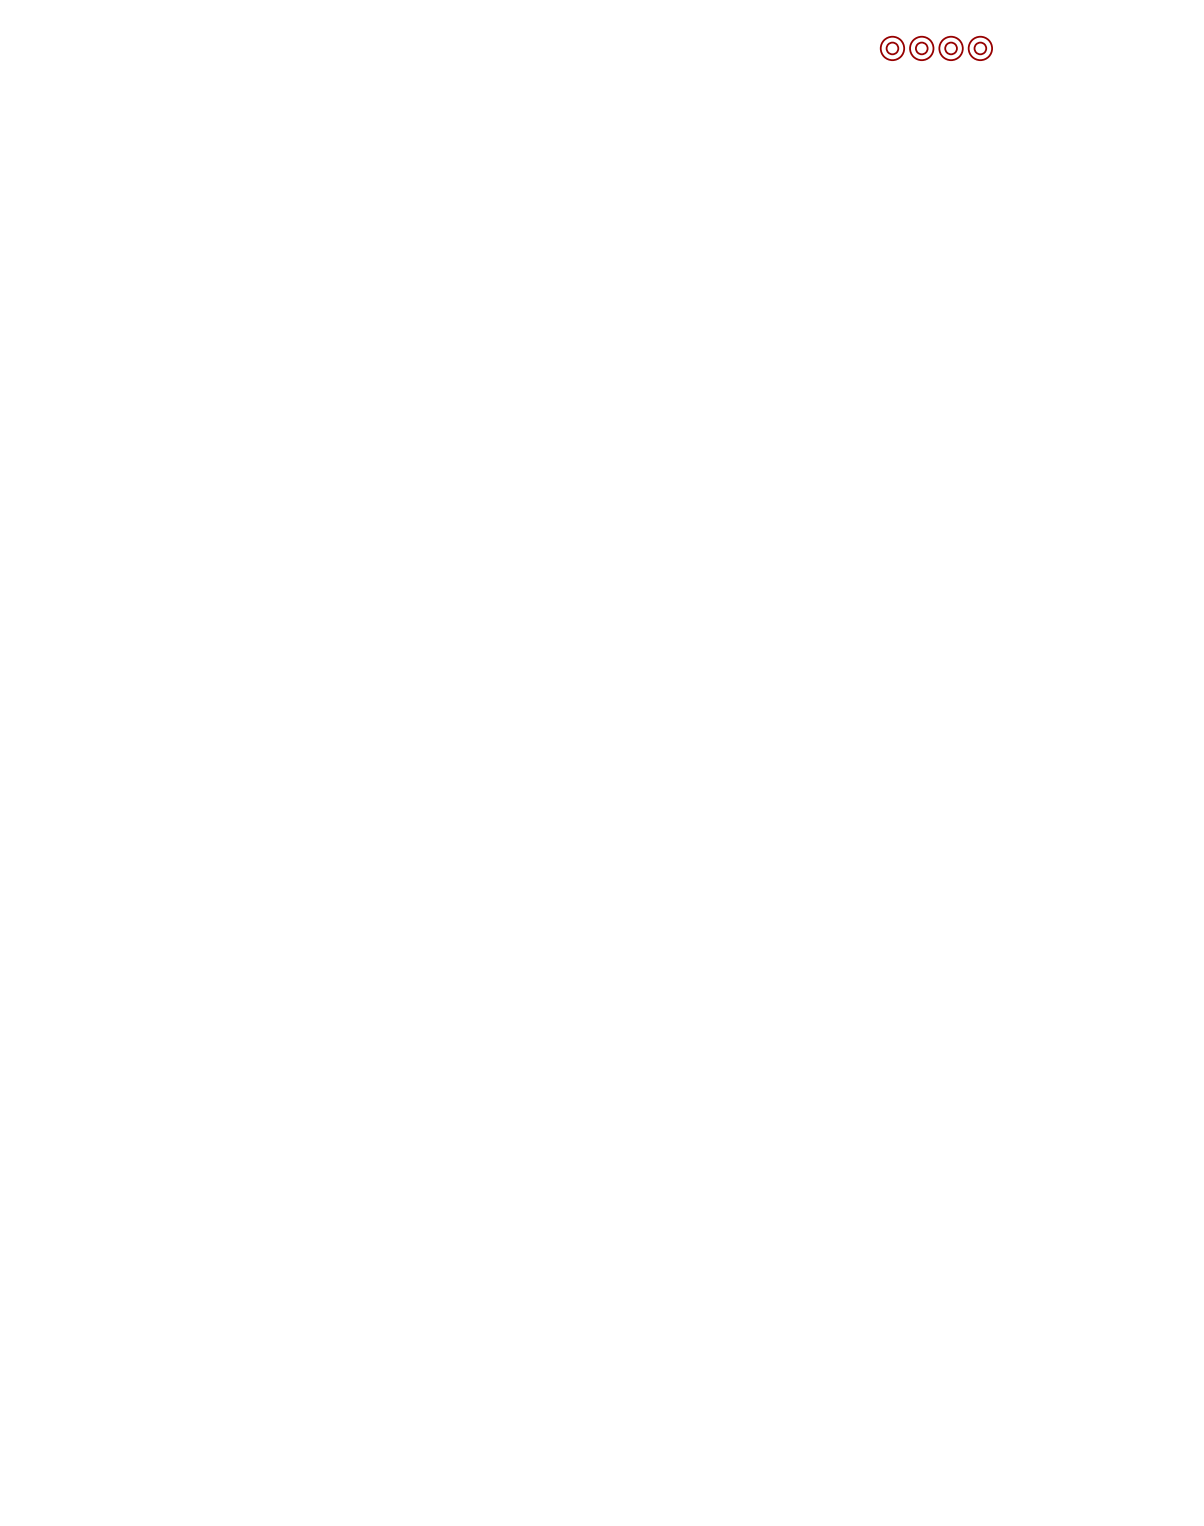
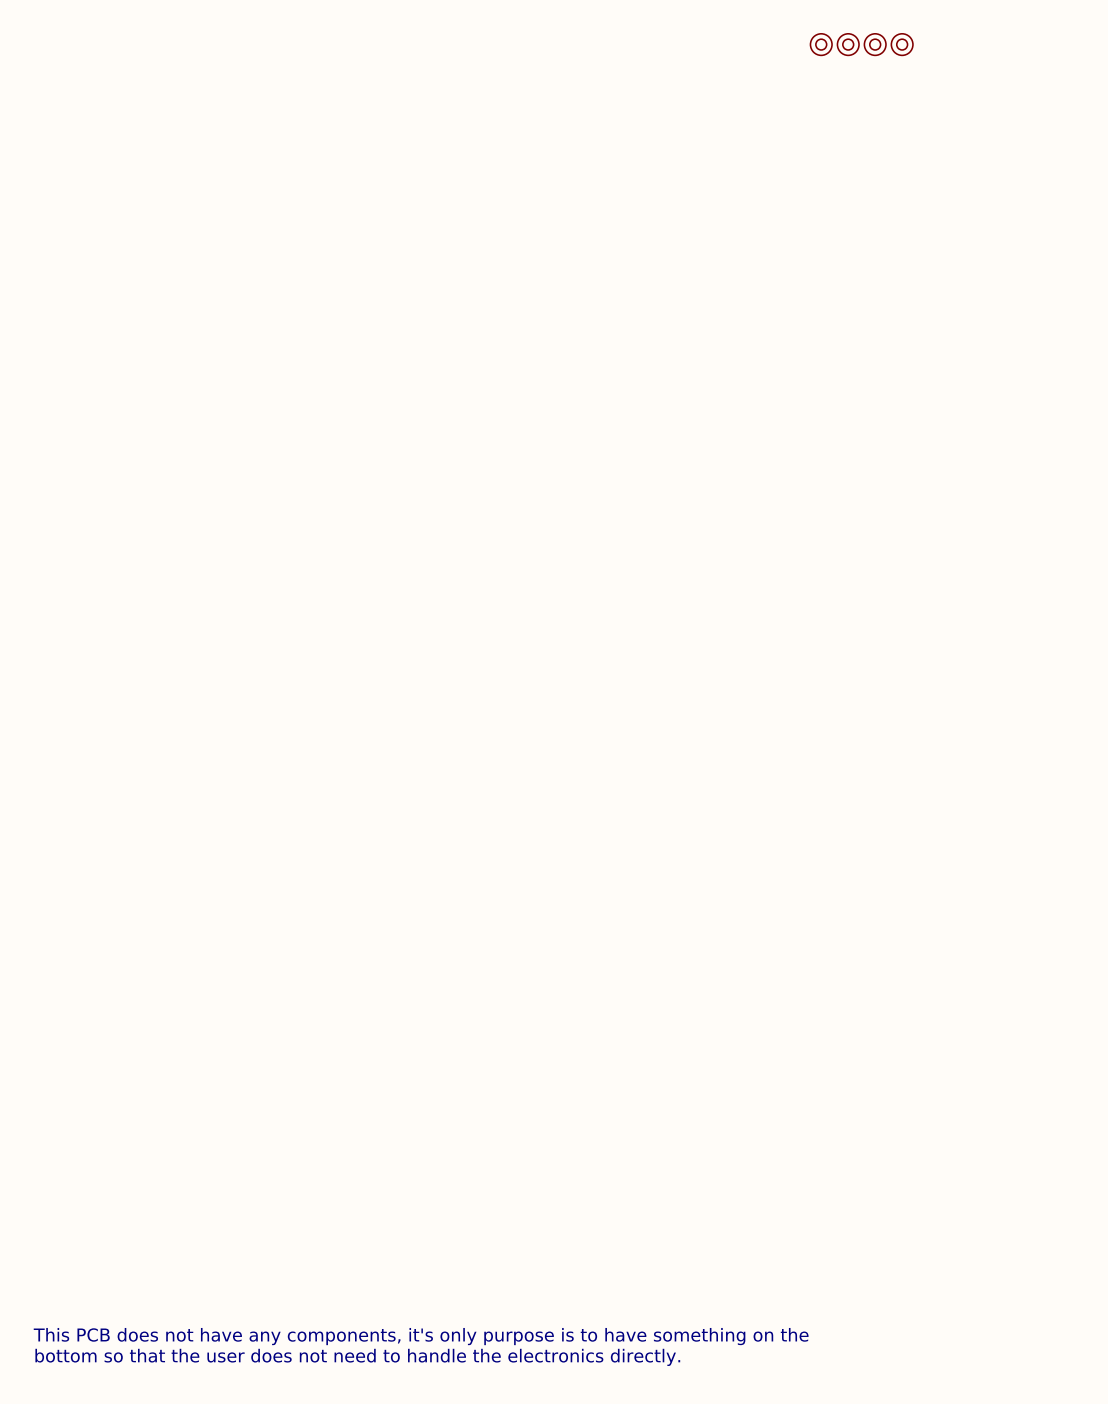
text: none -> This PCB does not have any components, it's only purpose is to have something on the (421, 1336)
text: none -> bottom so that the user does not need to handle the electronics directly. (357, 1357)

